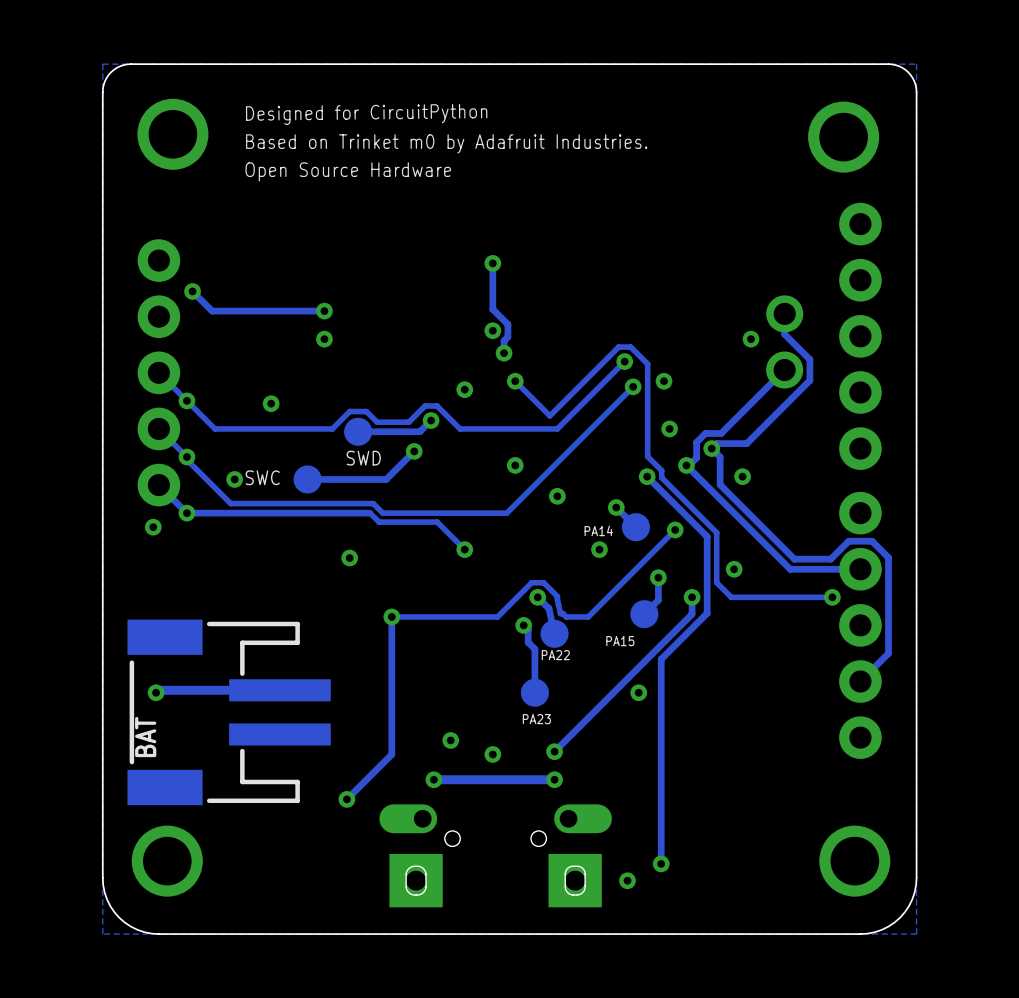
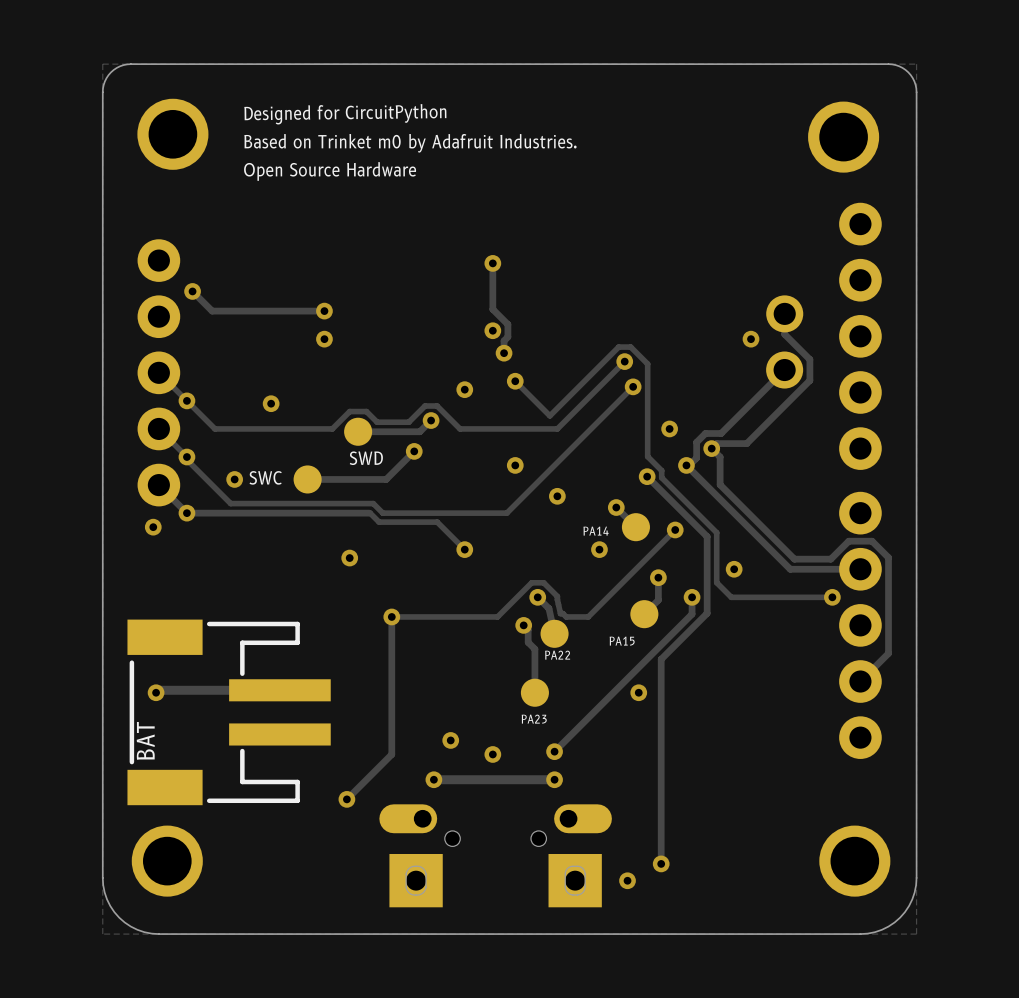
via: (664, 381) -> none
via: (742, 476) -> none

